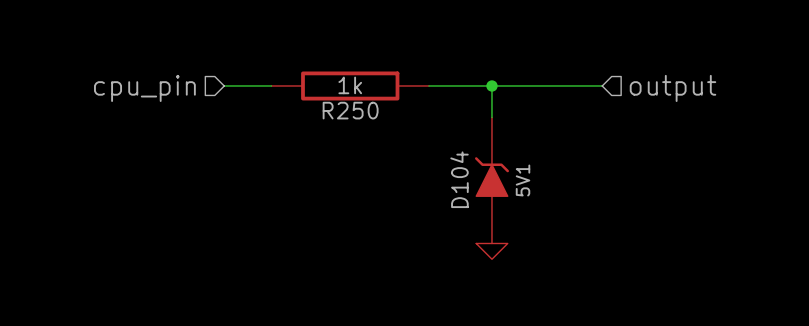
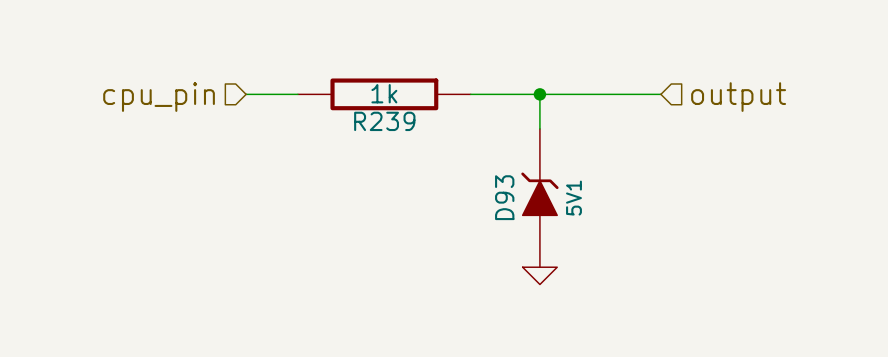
R250 name: R250 (350, 110) -> R239 (384, 121)
D104 name: D104 (459, 179) -> D93 (504, 197)

